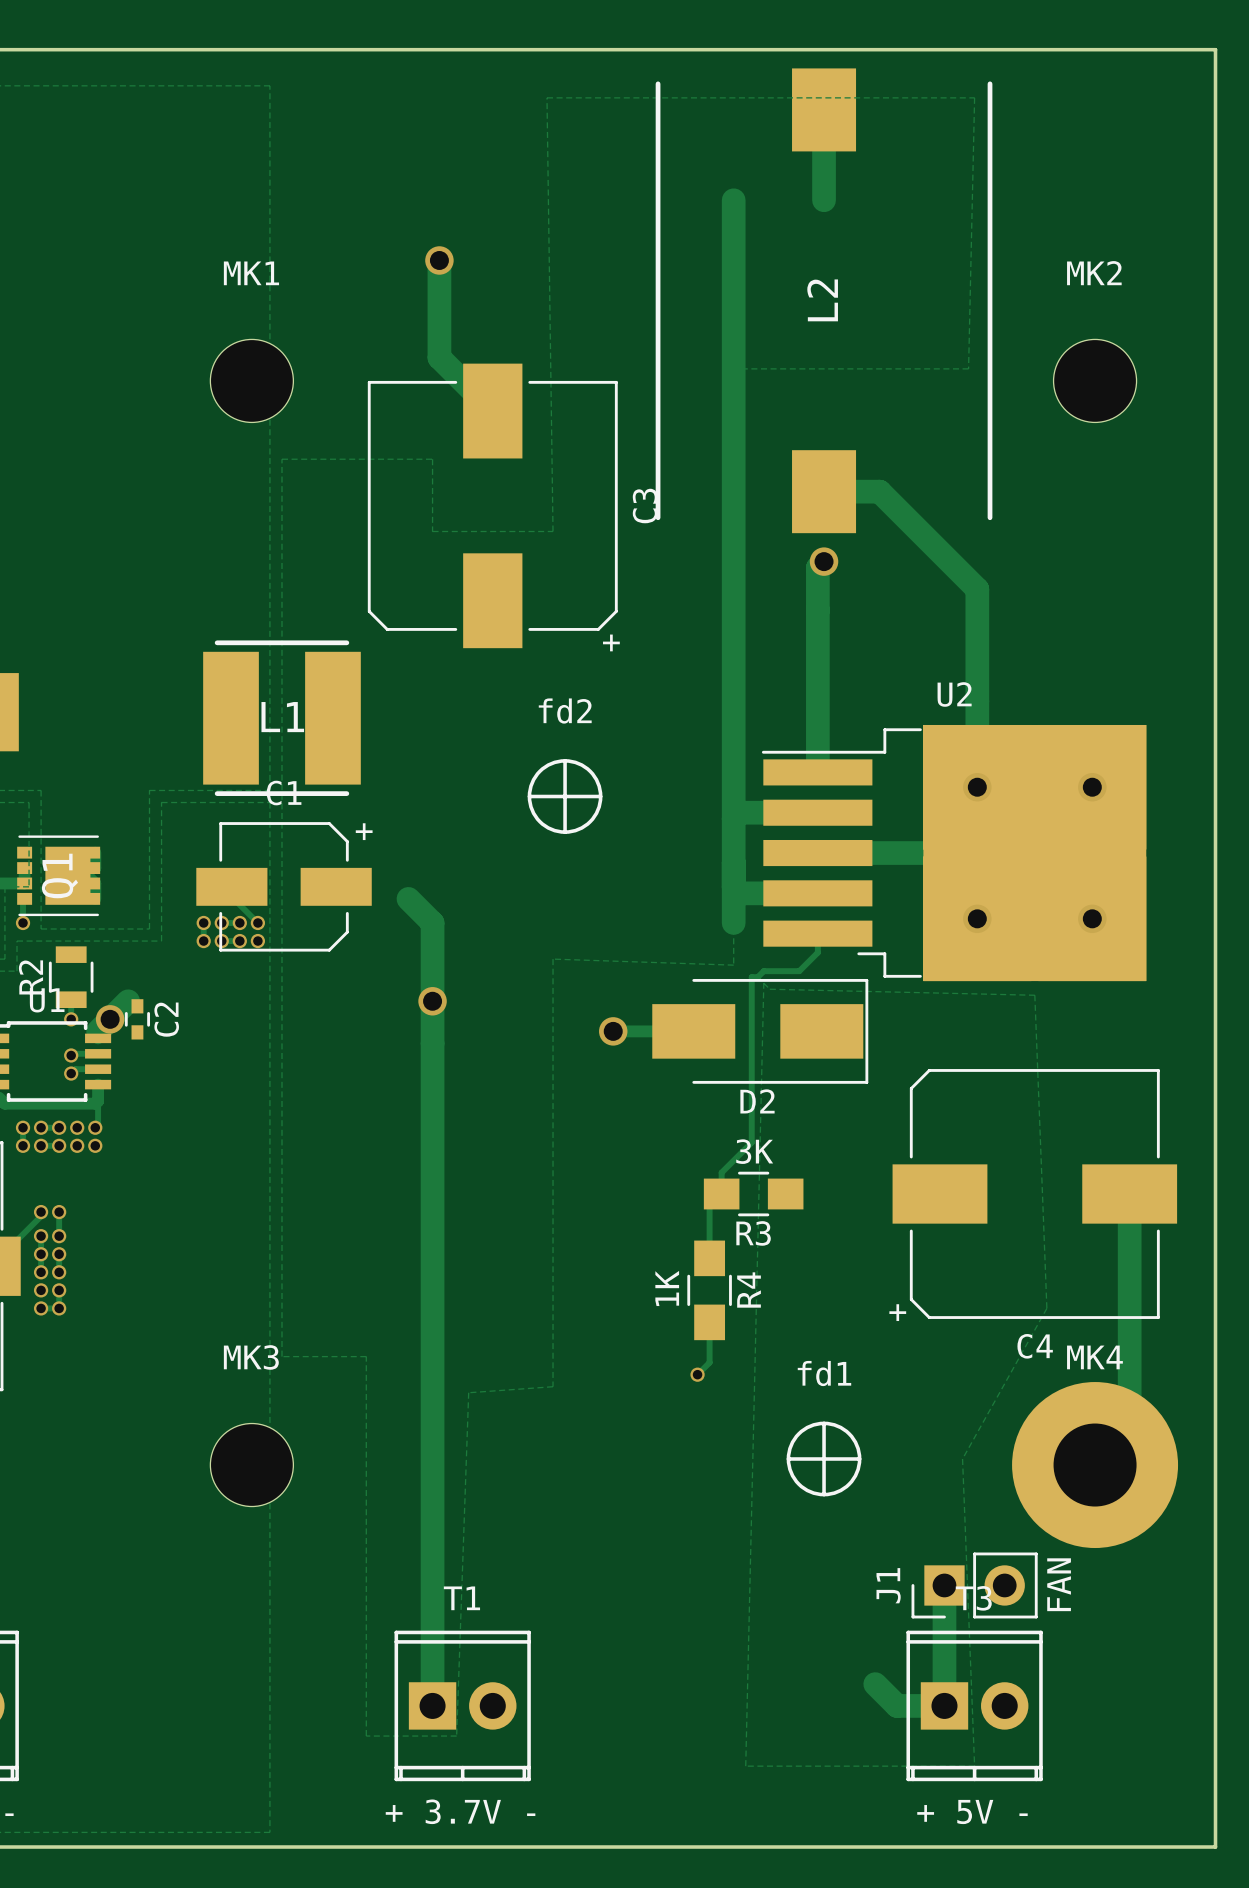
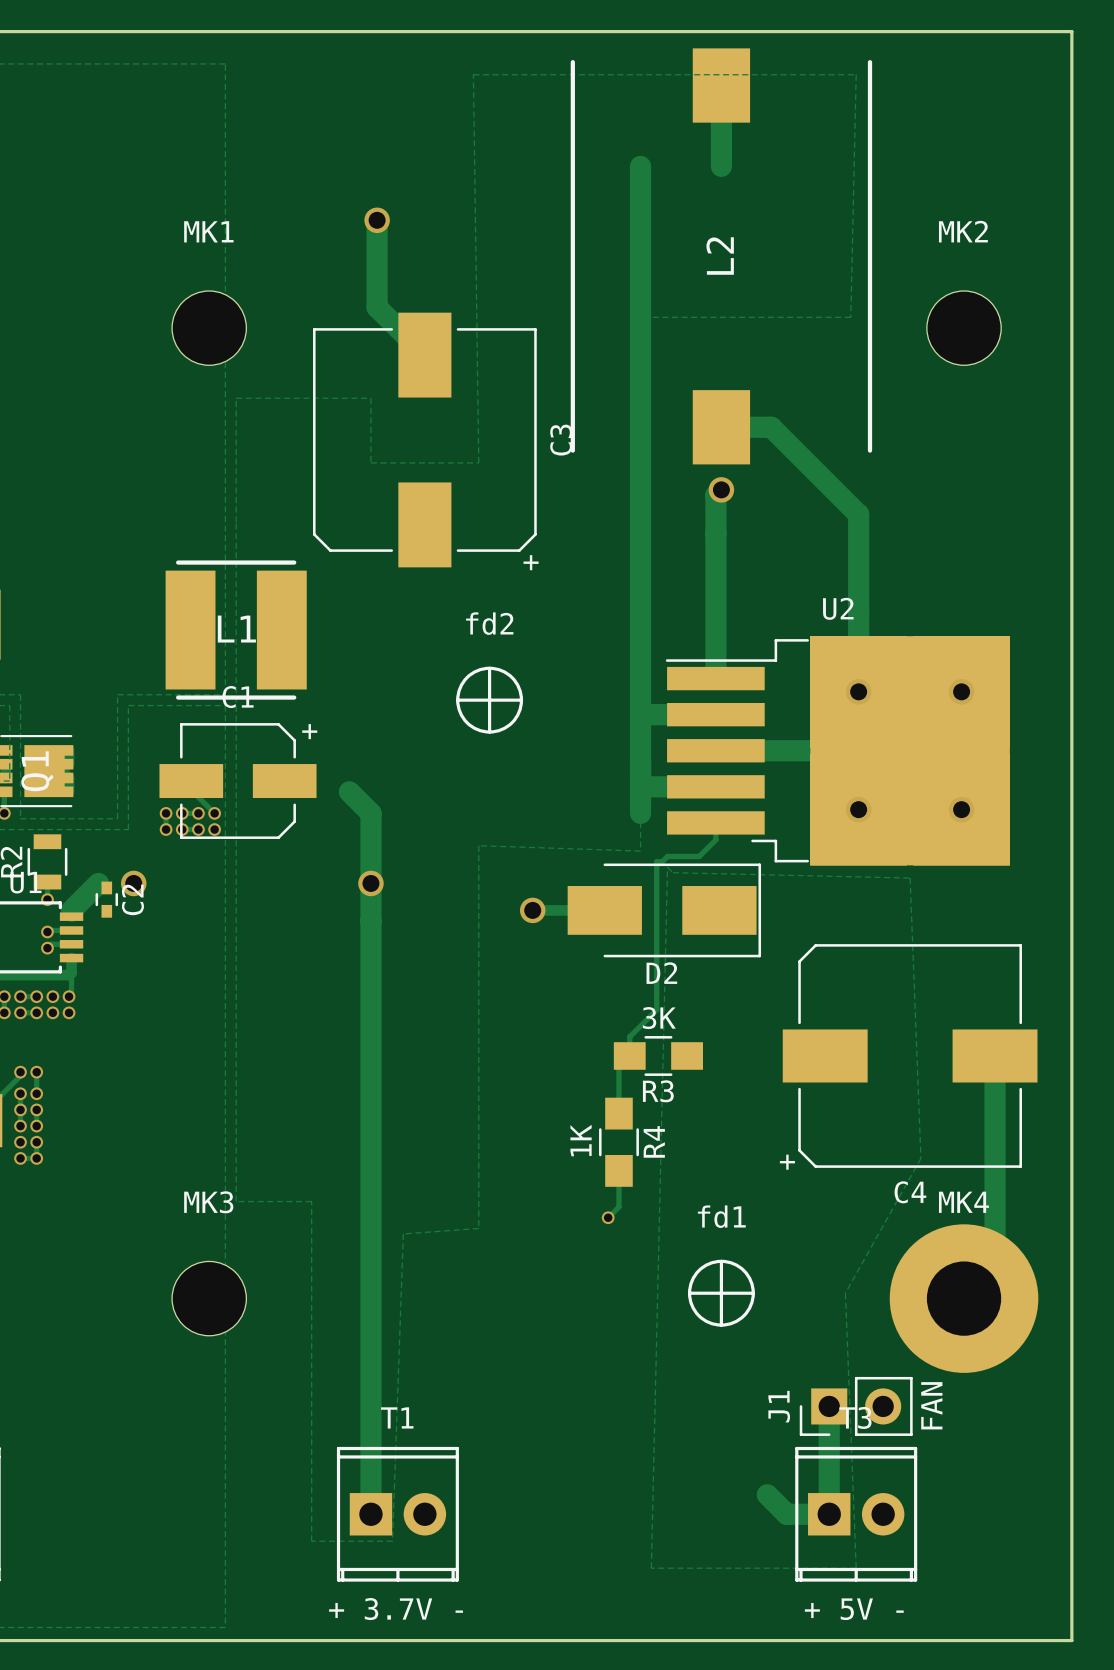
via position: (110, 1019) -> (133, 883)

